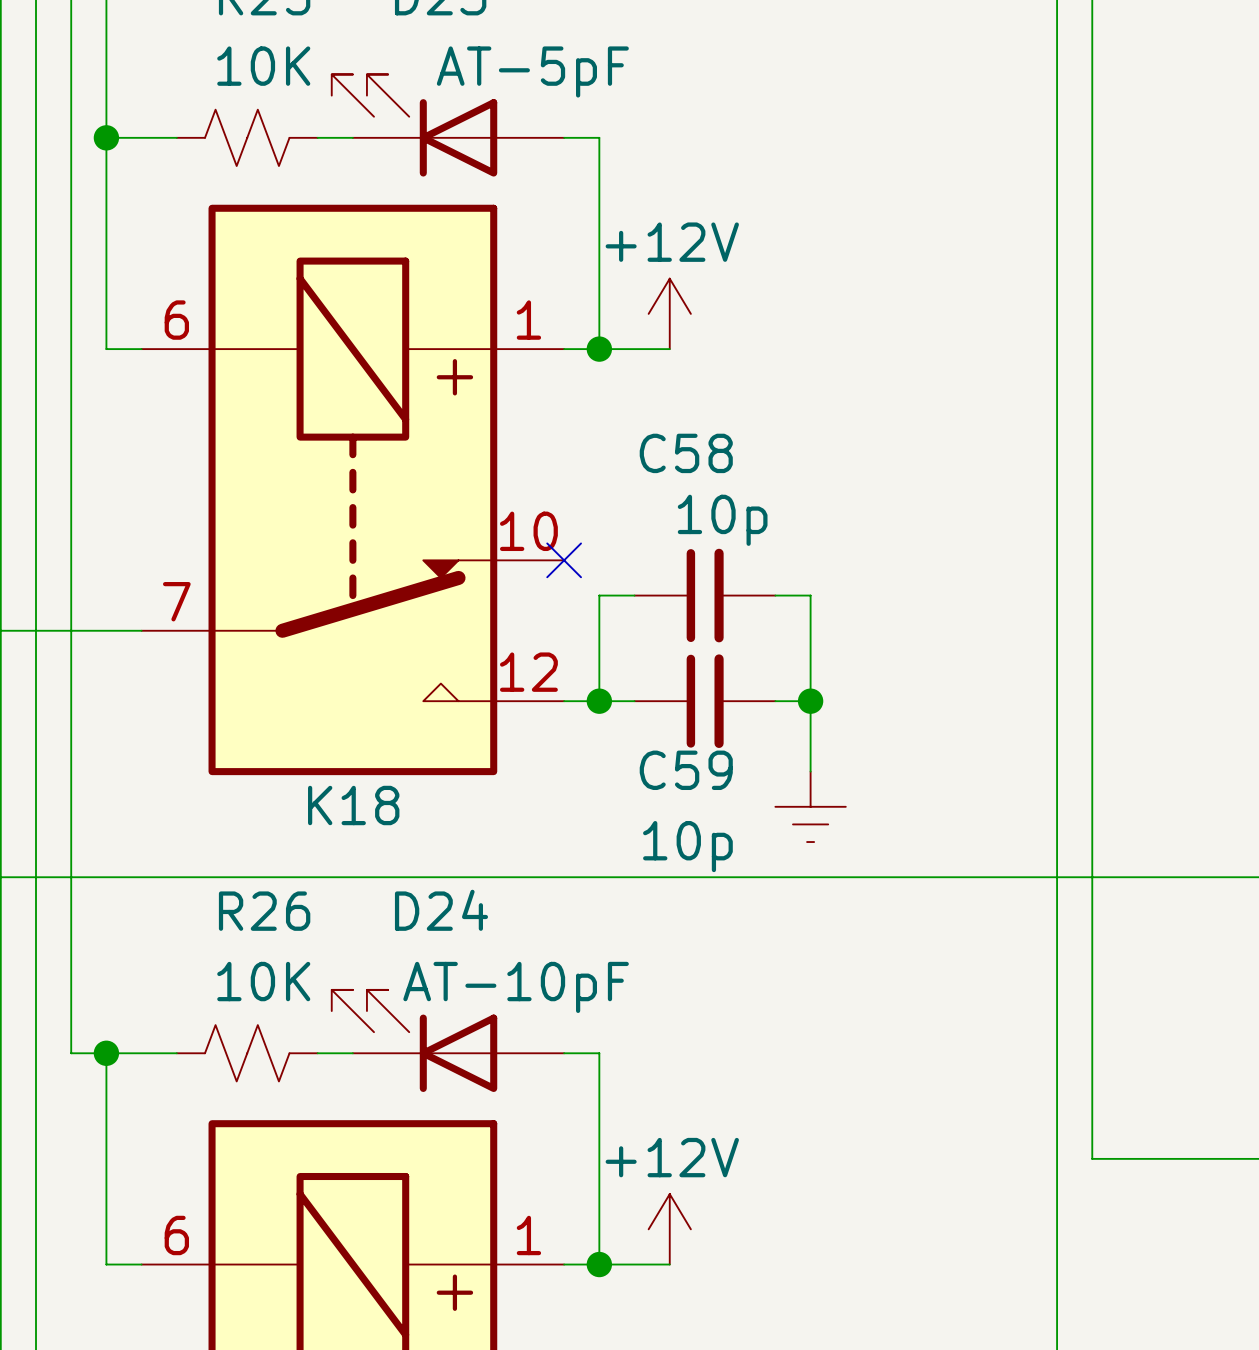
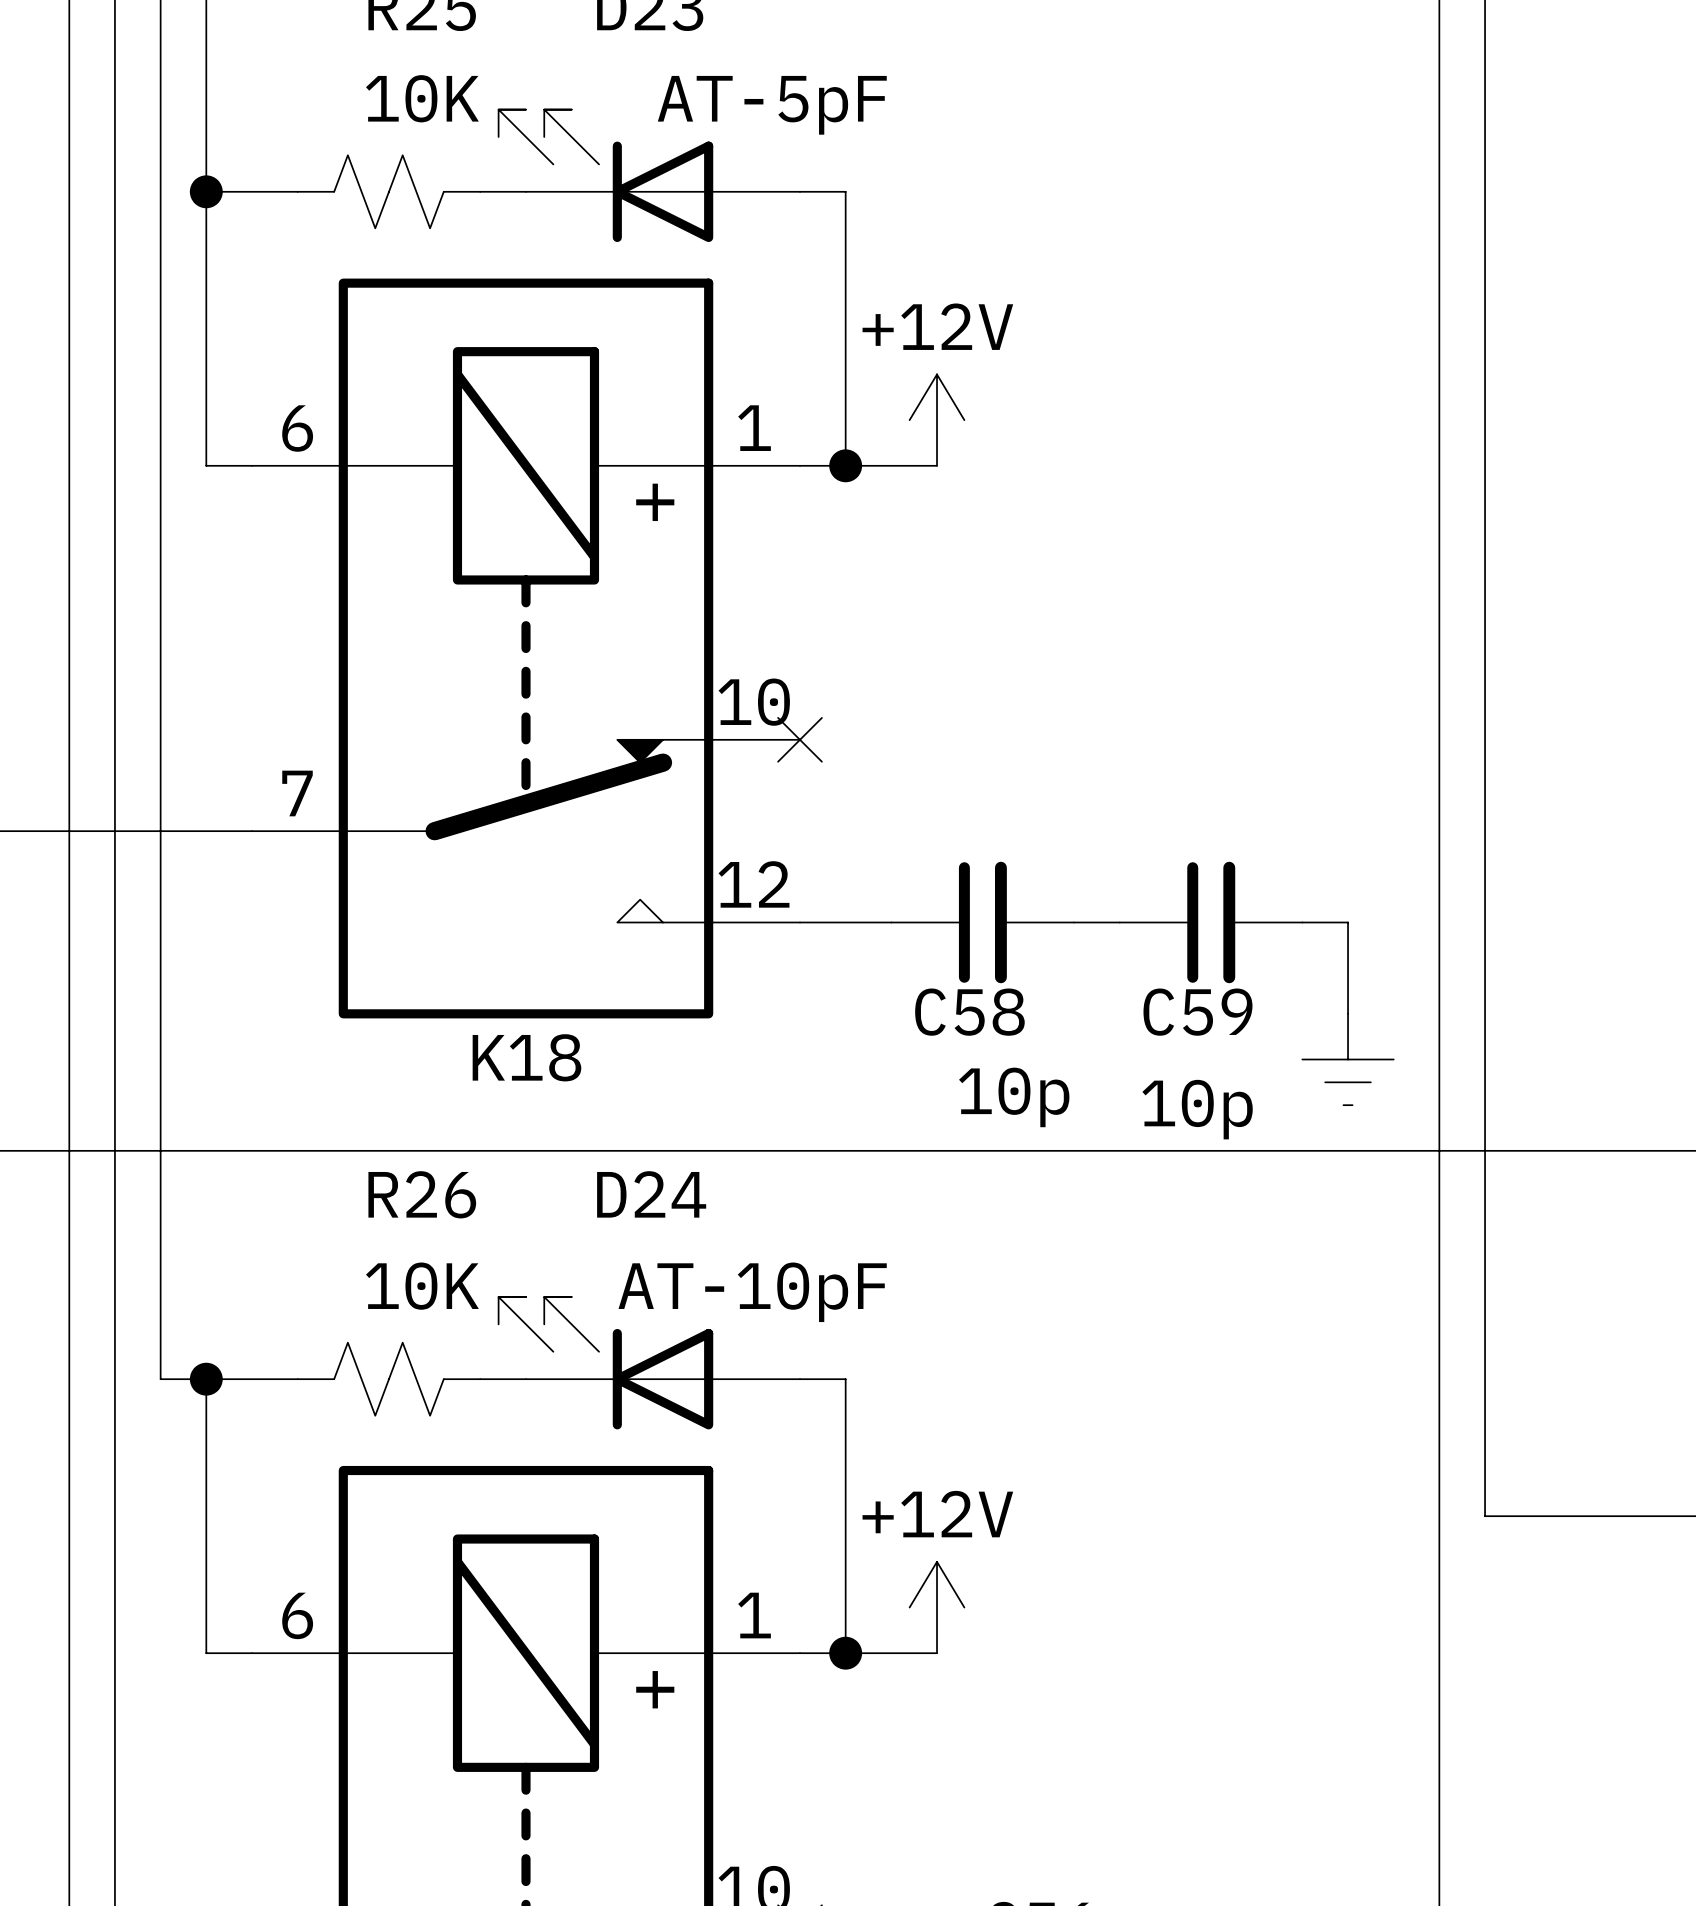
wire: (634, 595) (599, 595) (599, 701) -> none
C58: 10p (704, 595) -> none
wire: (775, 595) (810, 595) (810, 771) -> none
junction: (599, 701) -> none
junction: (810, 701) -> none
C59: none -> 10p (1211, 922)
wire: none -> (1302, 922) (1348, 922) (1348, 1013)
C59 name: C59 (686, 770) -> C58 (969, 1012)
power symbol position: (810, 806) -> (1348, 1059)
C59 value position: 10p (687, 846) -> 10p (1014, 1097)

